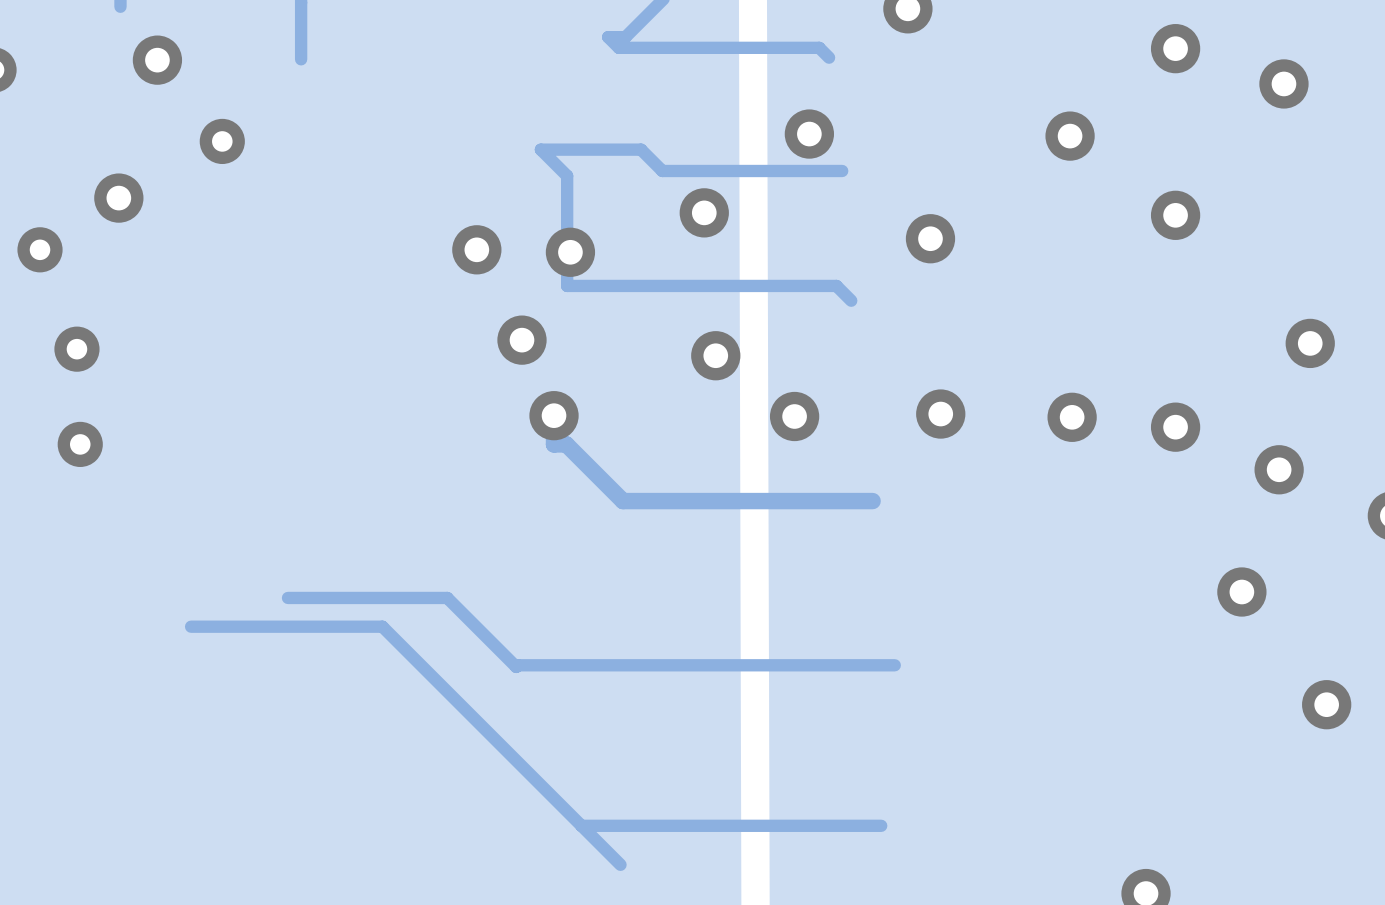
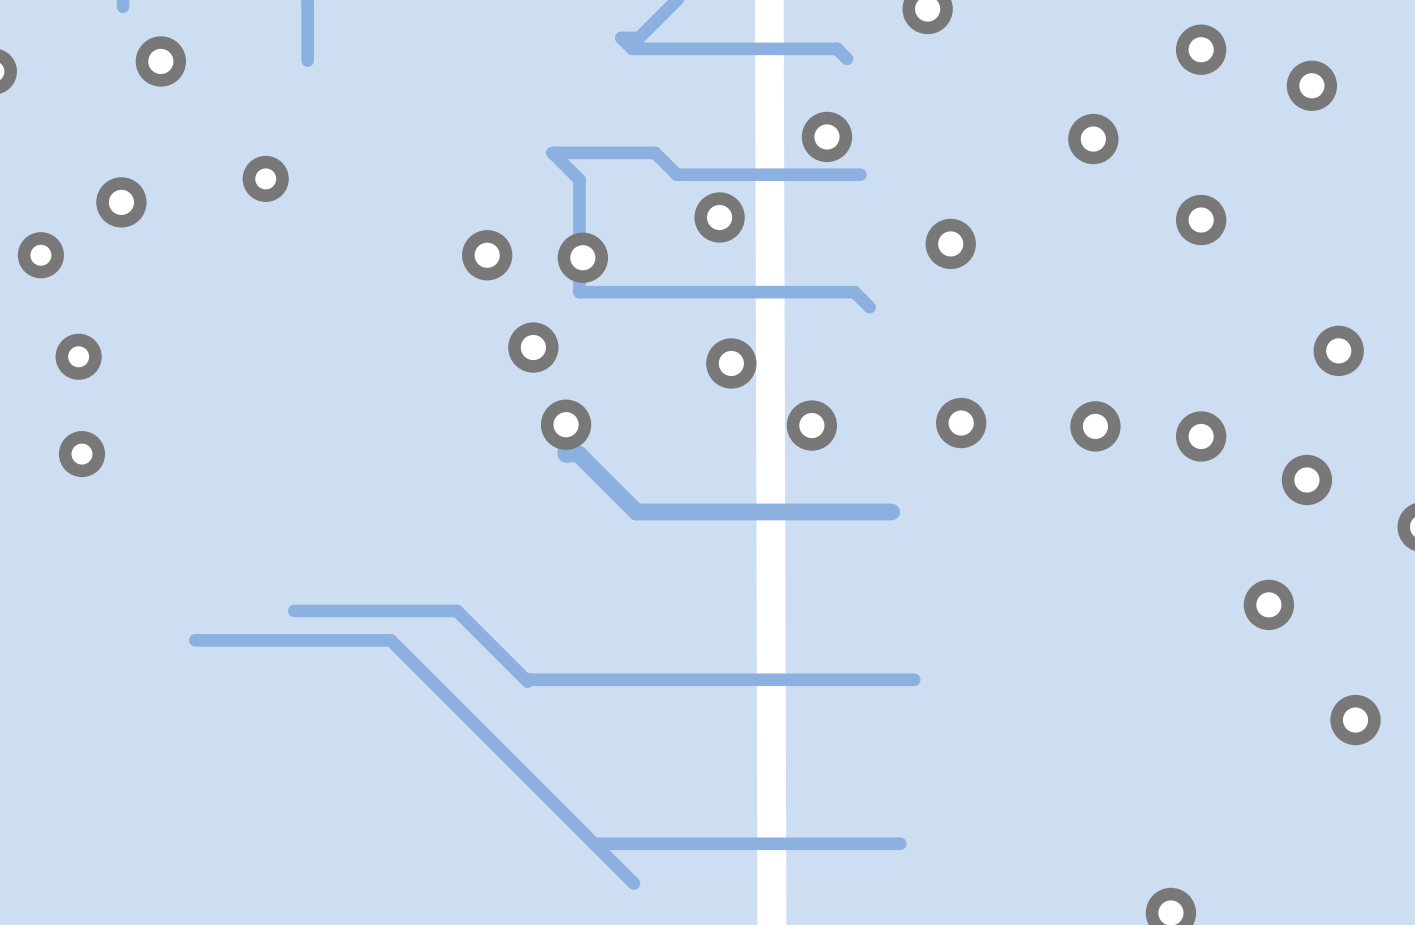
via position: (222, 141) -> (265, 178)

